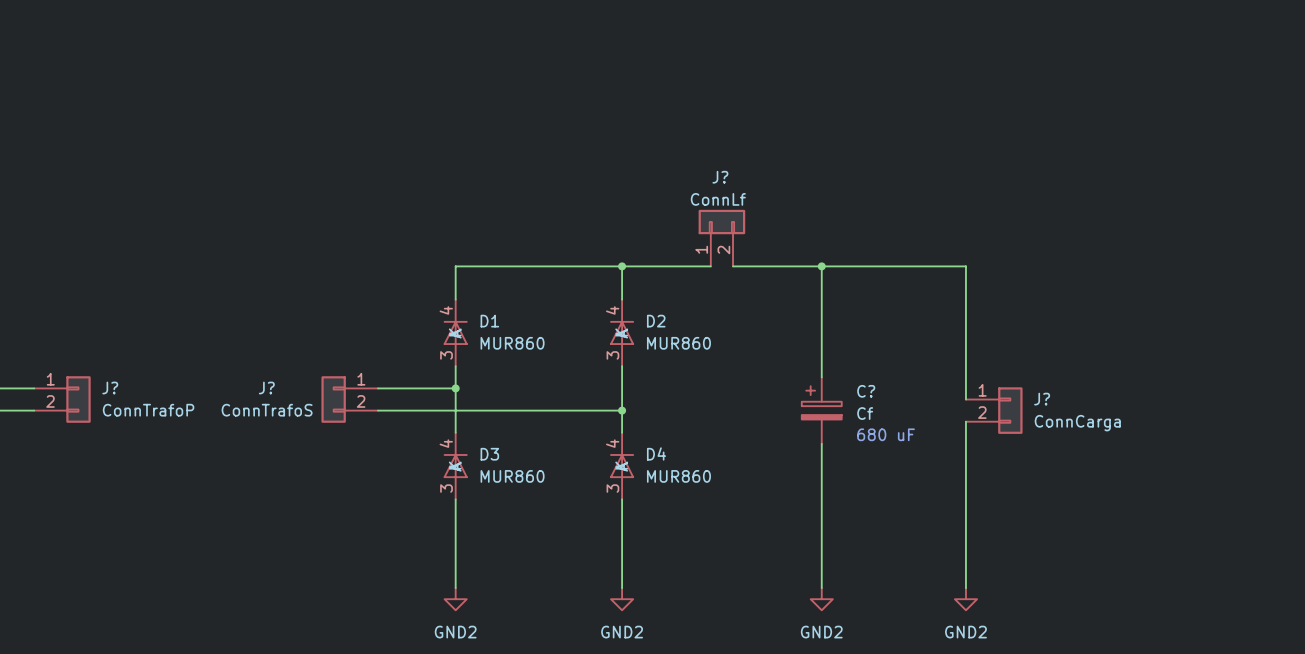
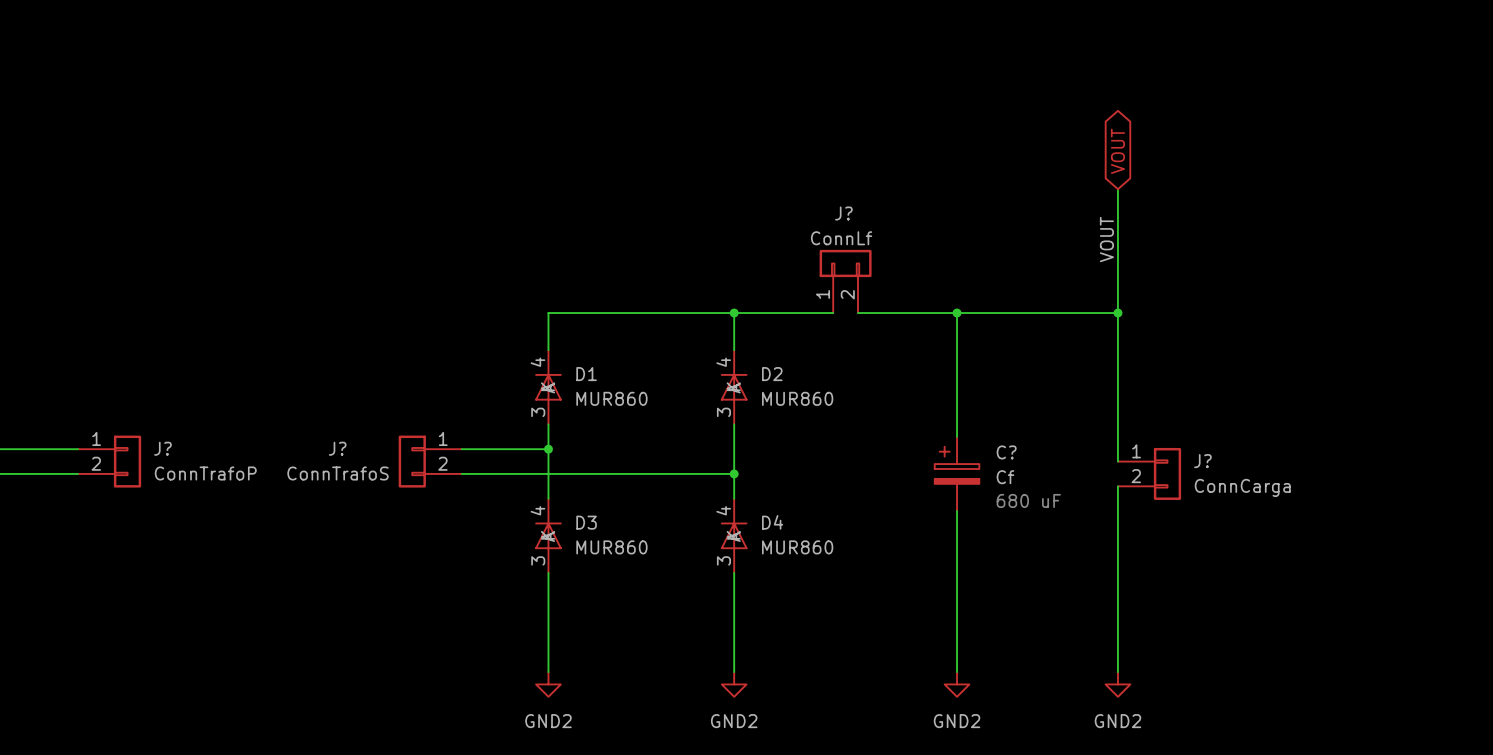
global label: none -> VOUT (1117, 151)
wire: none -> (1117, 189) (1117, 313)
label: none -> VOUT (1106, 239)
junction: none -> (1117, 313)

